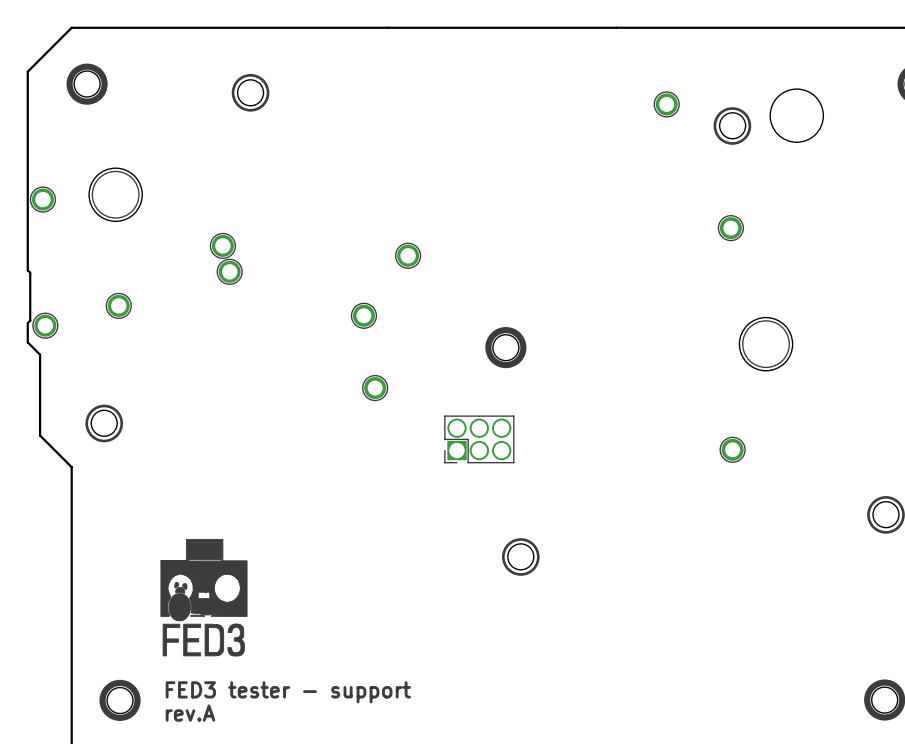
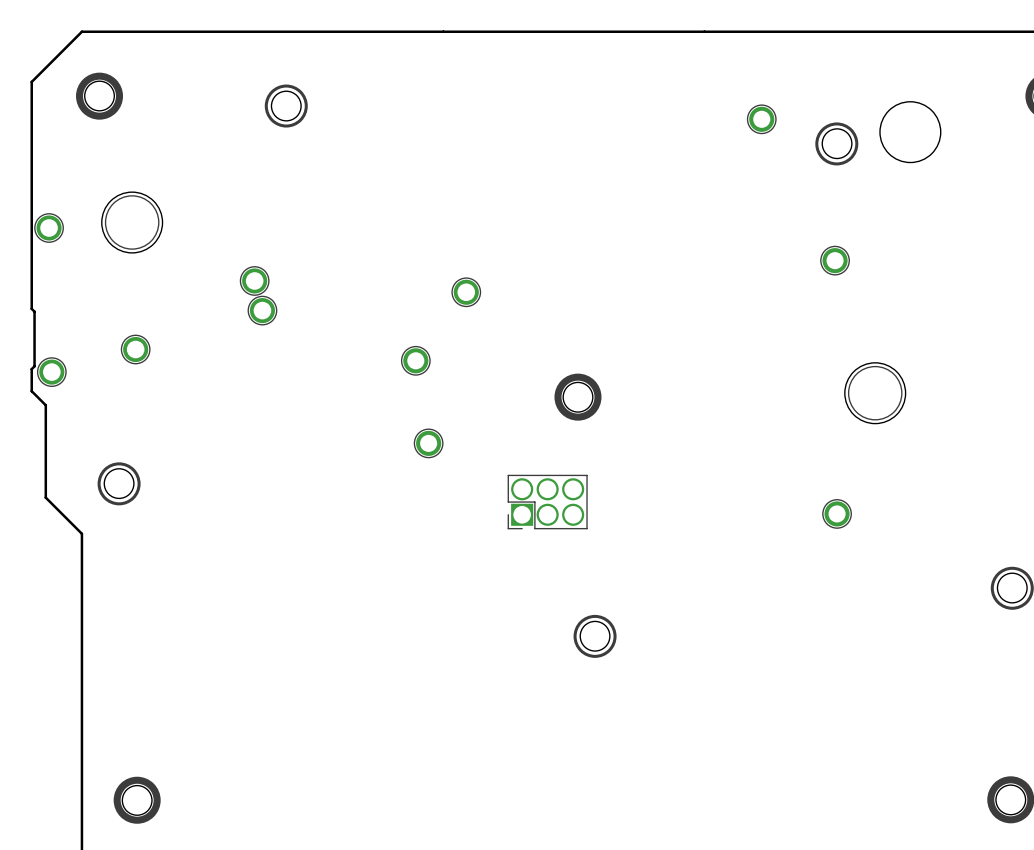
drawing: [160, 538, 248, 657] -> none
text: FED3 tester - support (288, 692) -> none
text: rev.A (190, 713) -> none

